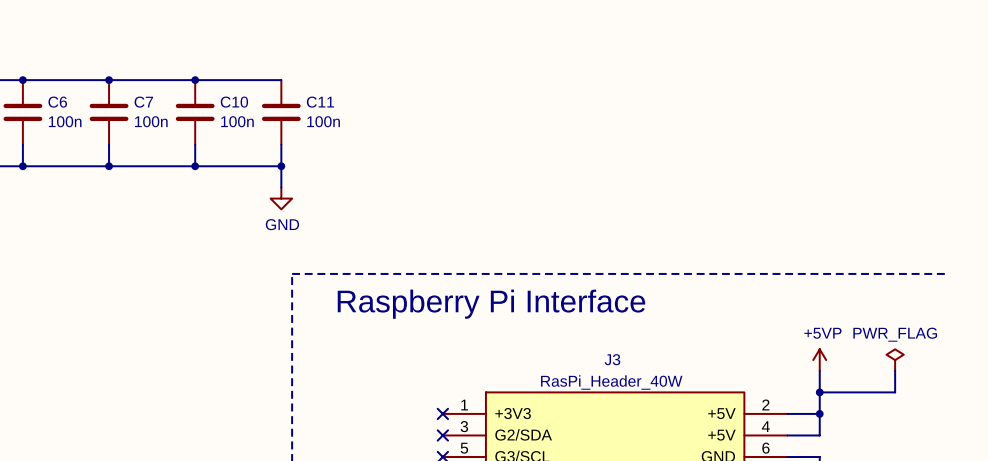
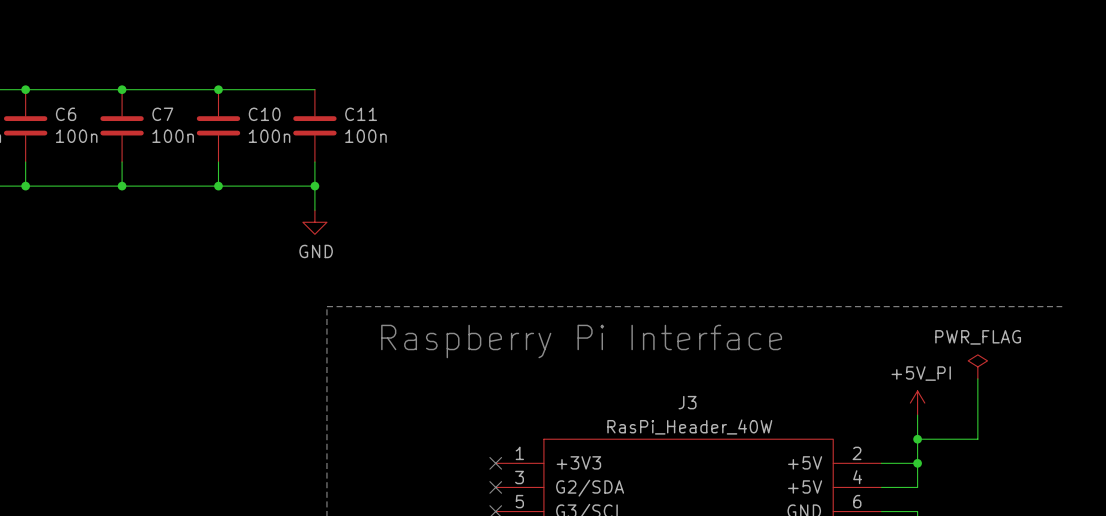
power symbol: +5VP (819, 360) -> +5V_PI (917, 403)
power symbol position: PWR_FLAG (895, 360) -> PWR_FLAG (977, 366)
wire: (895, 370) (895, 392) (873, 392) -> (977, 378) (977, 439)

